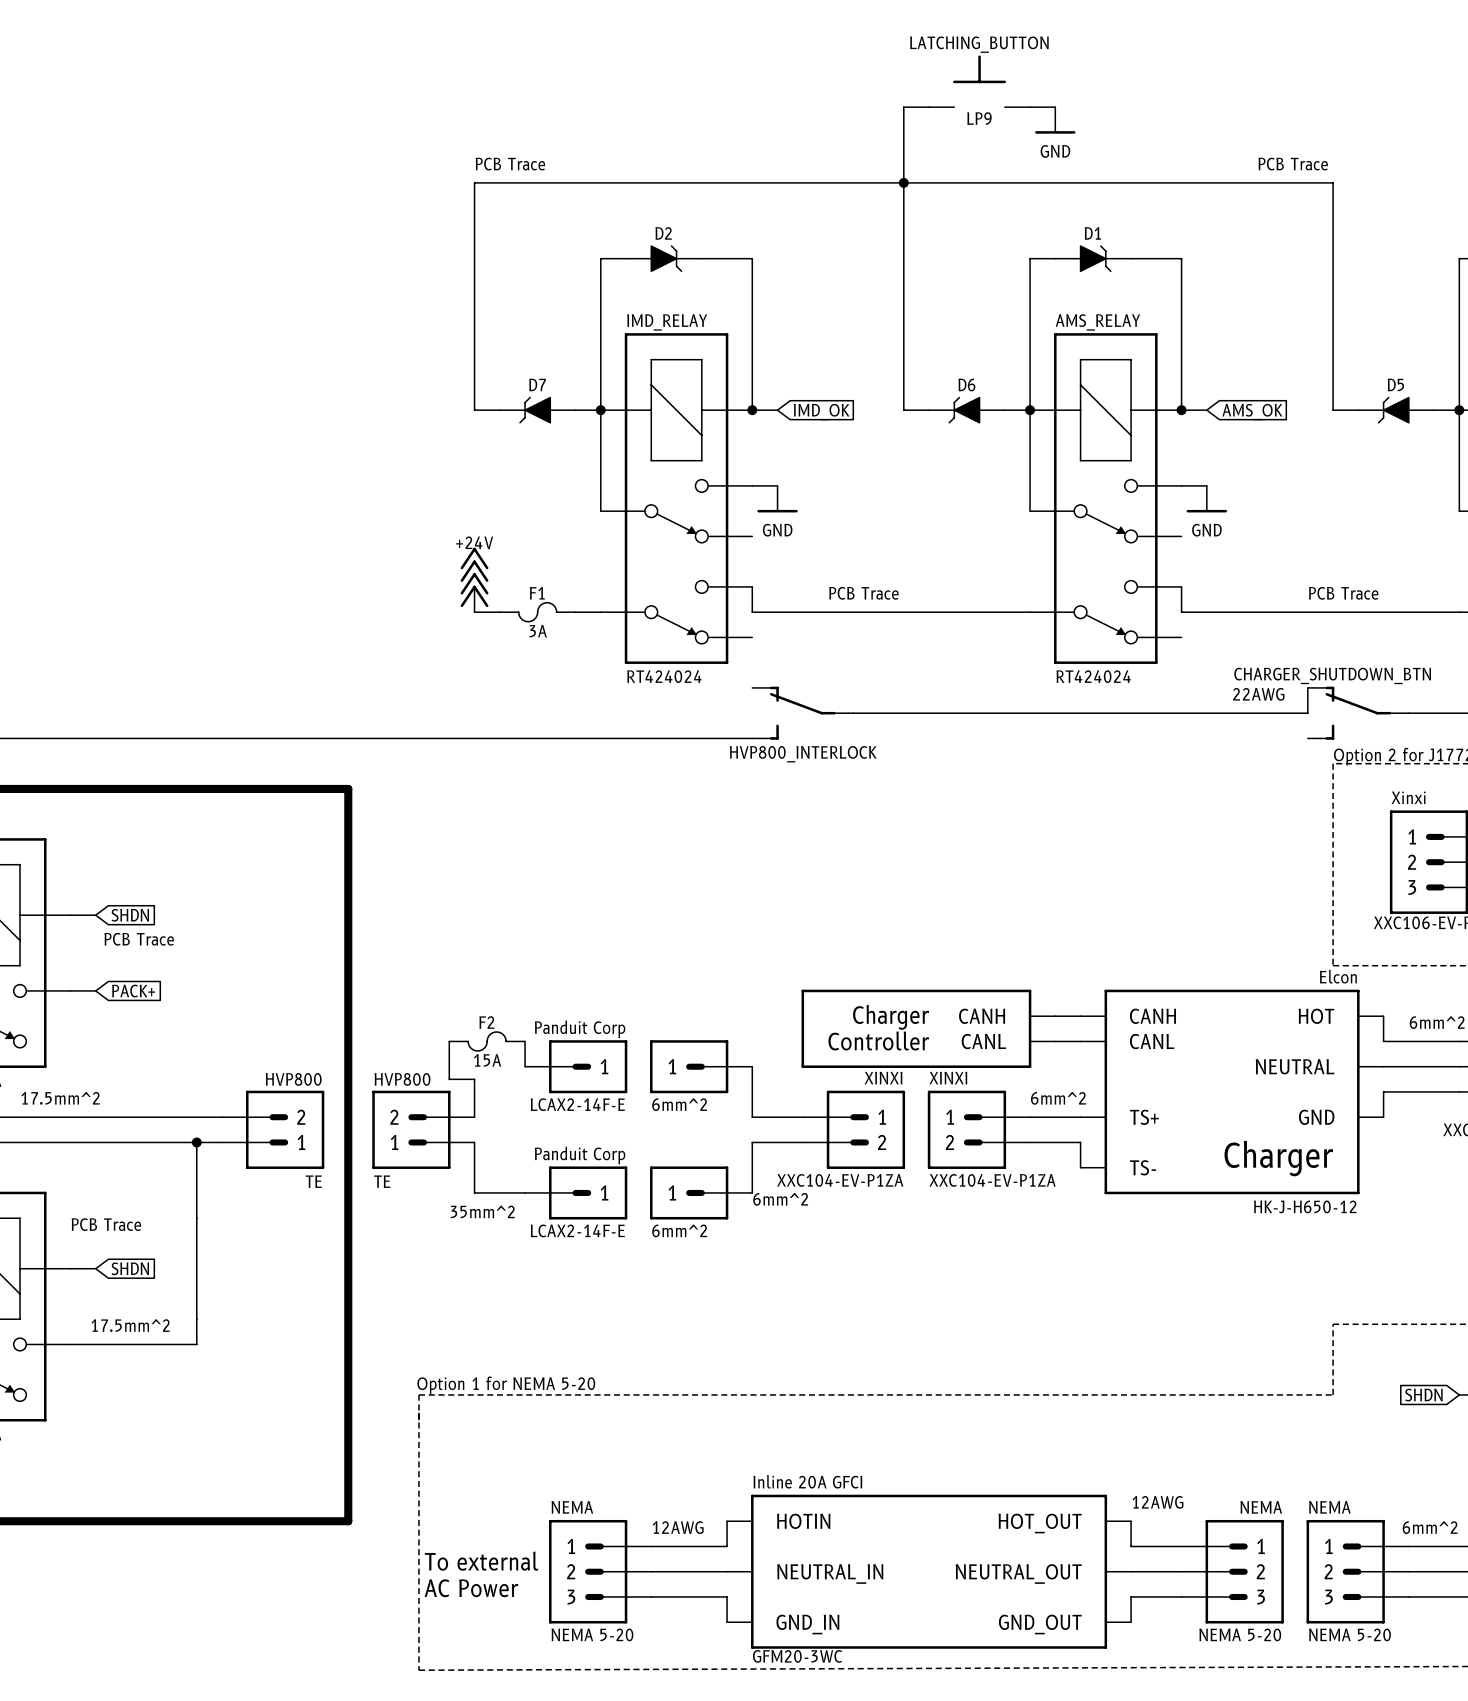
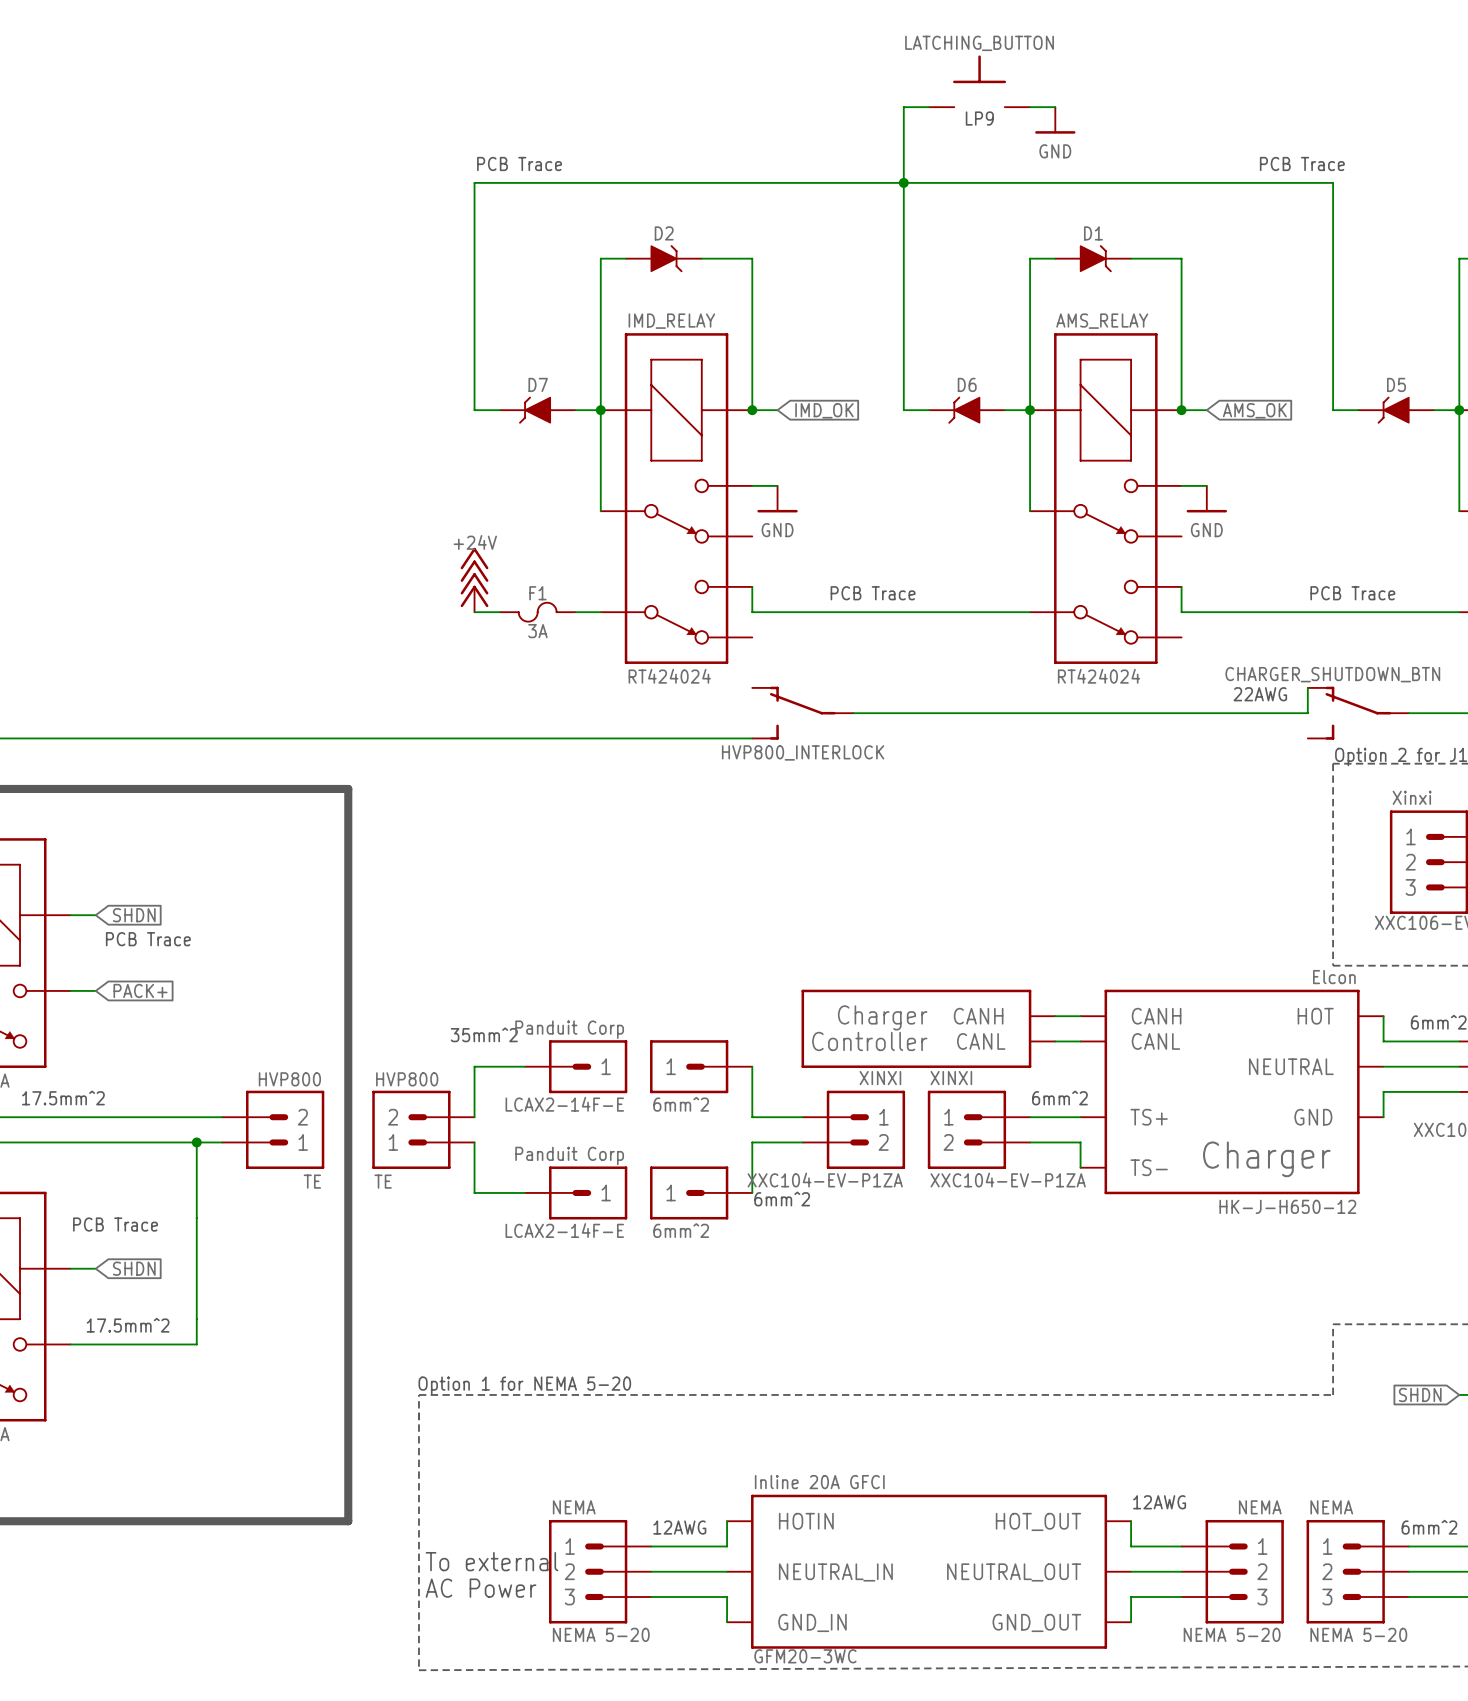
wire: (449, 1041) (449, 1079) (474, 1079) -> none
F2: 15A (487, 1041) -> none
wire: (525, 1041) (525, 1066) -> (474, 1079) (474, 1066) (525, 1066)
text position: 35mm^2 (482, 1211) -> 35mm^2 (484, 1034)

